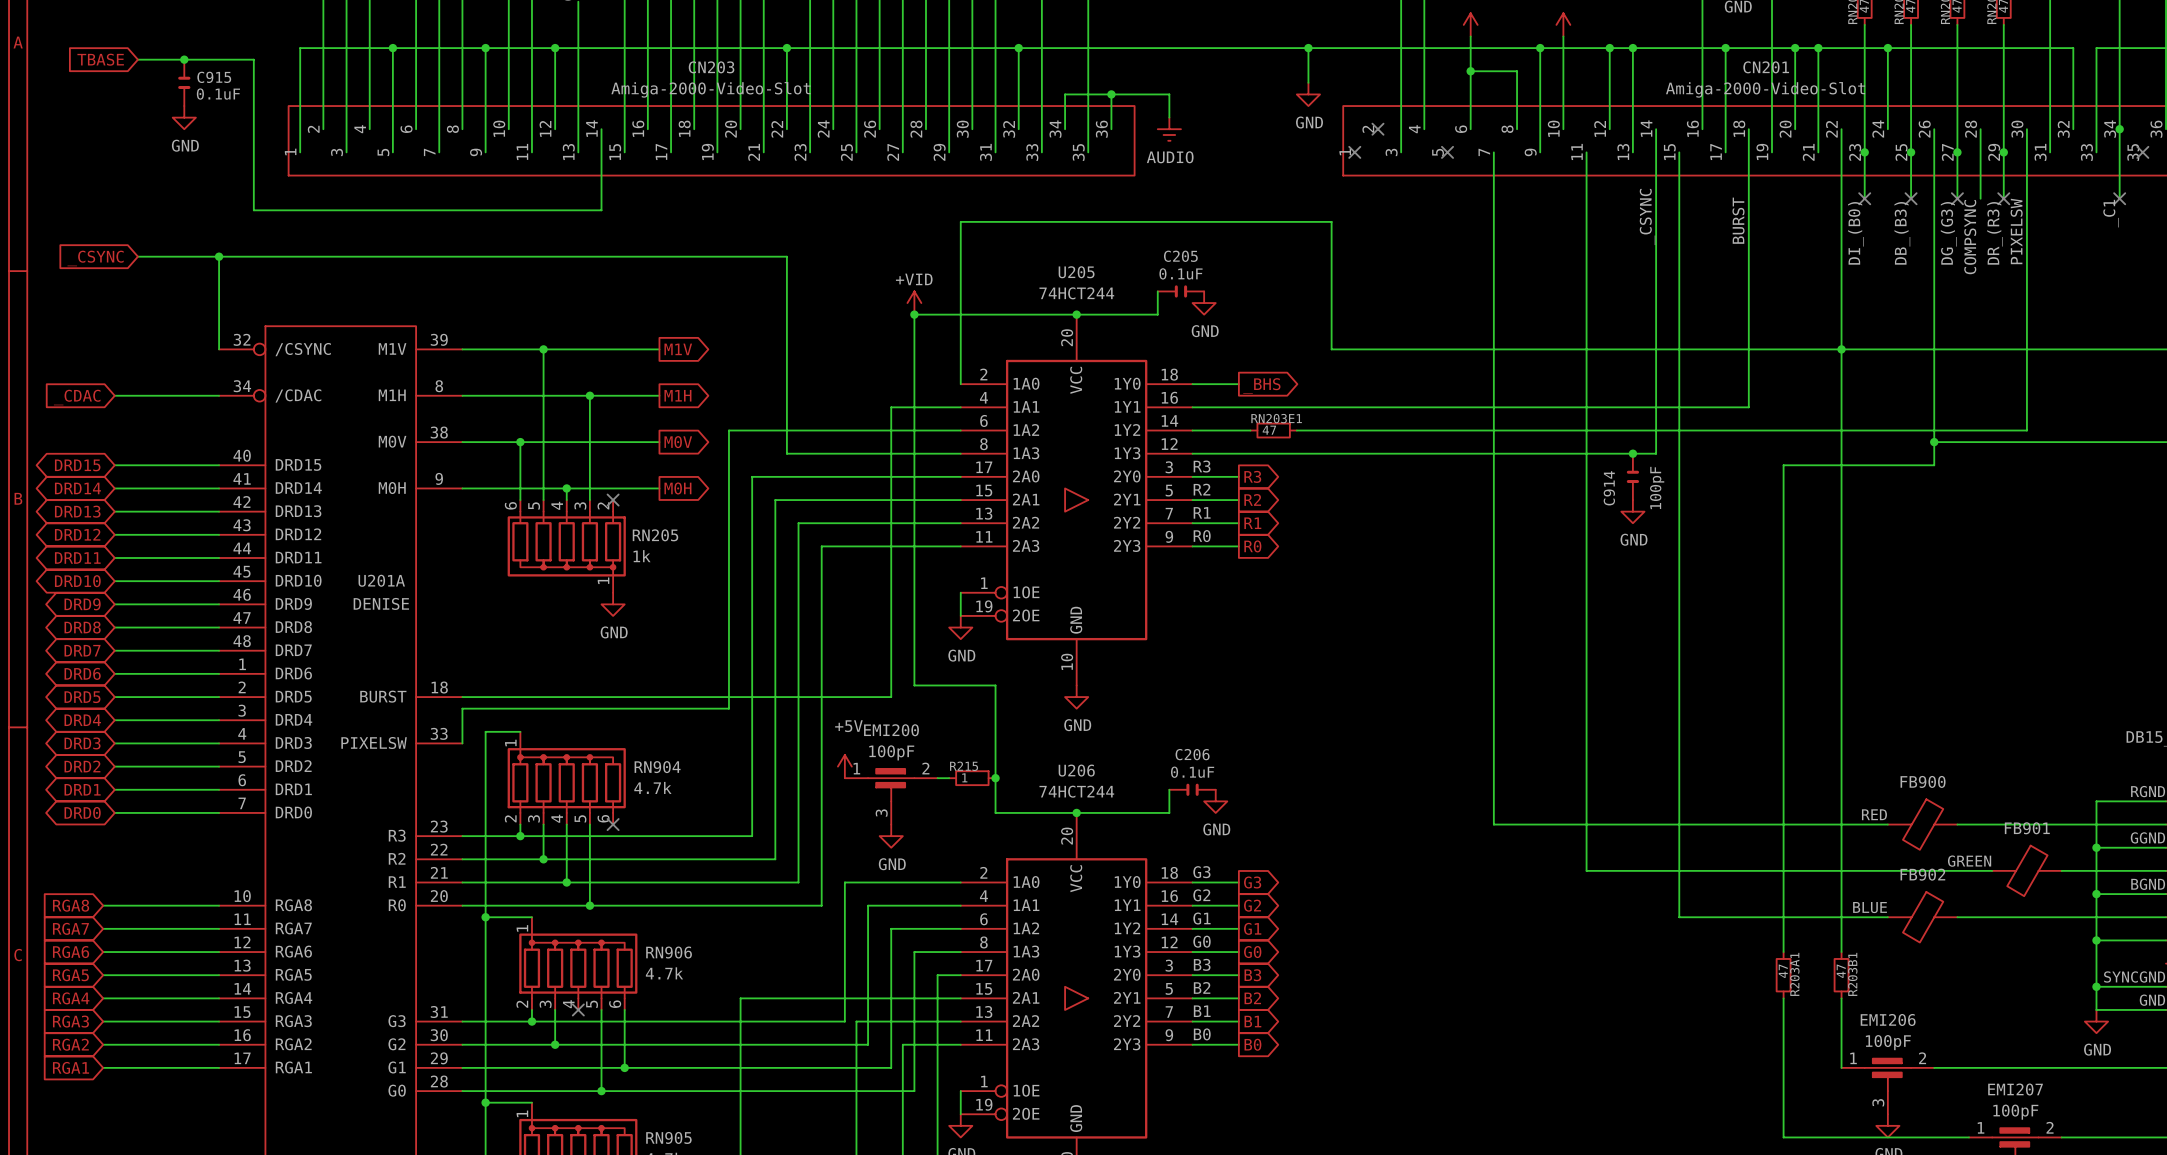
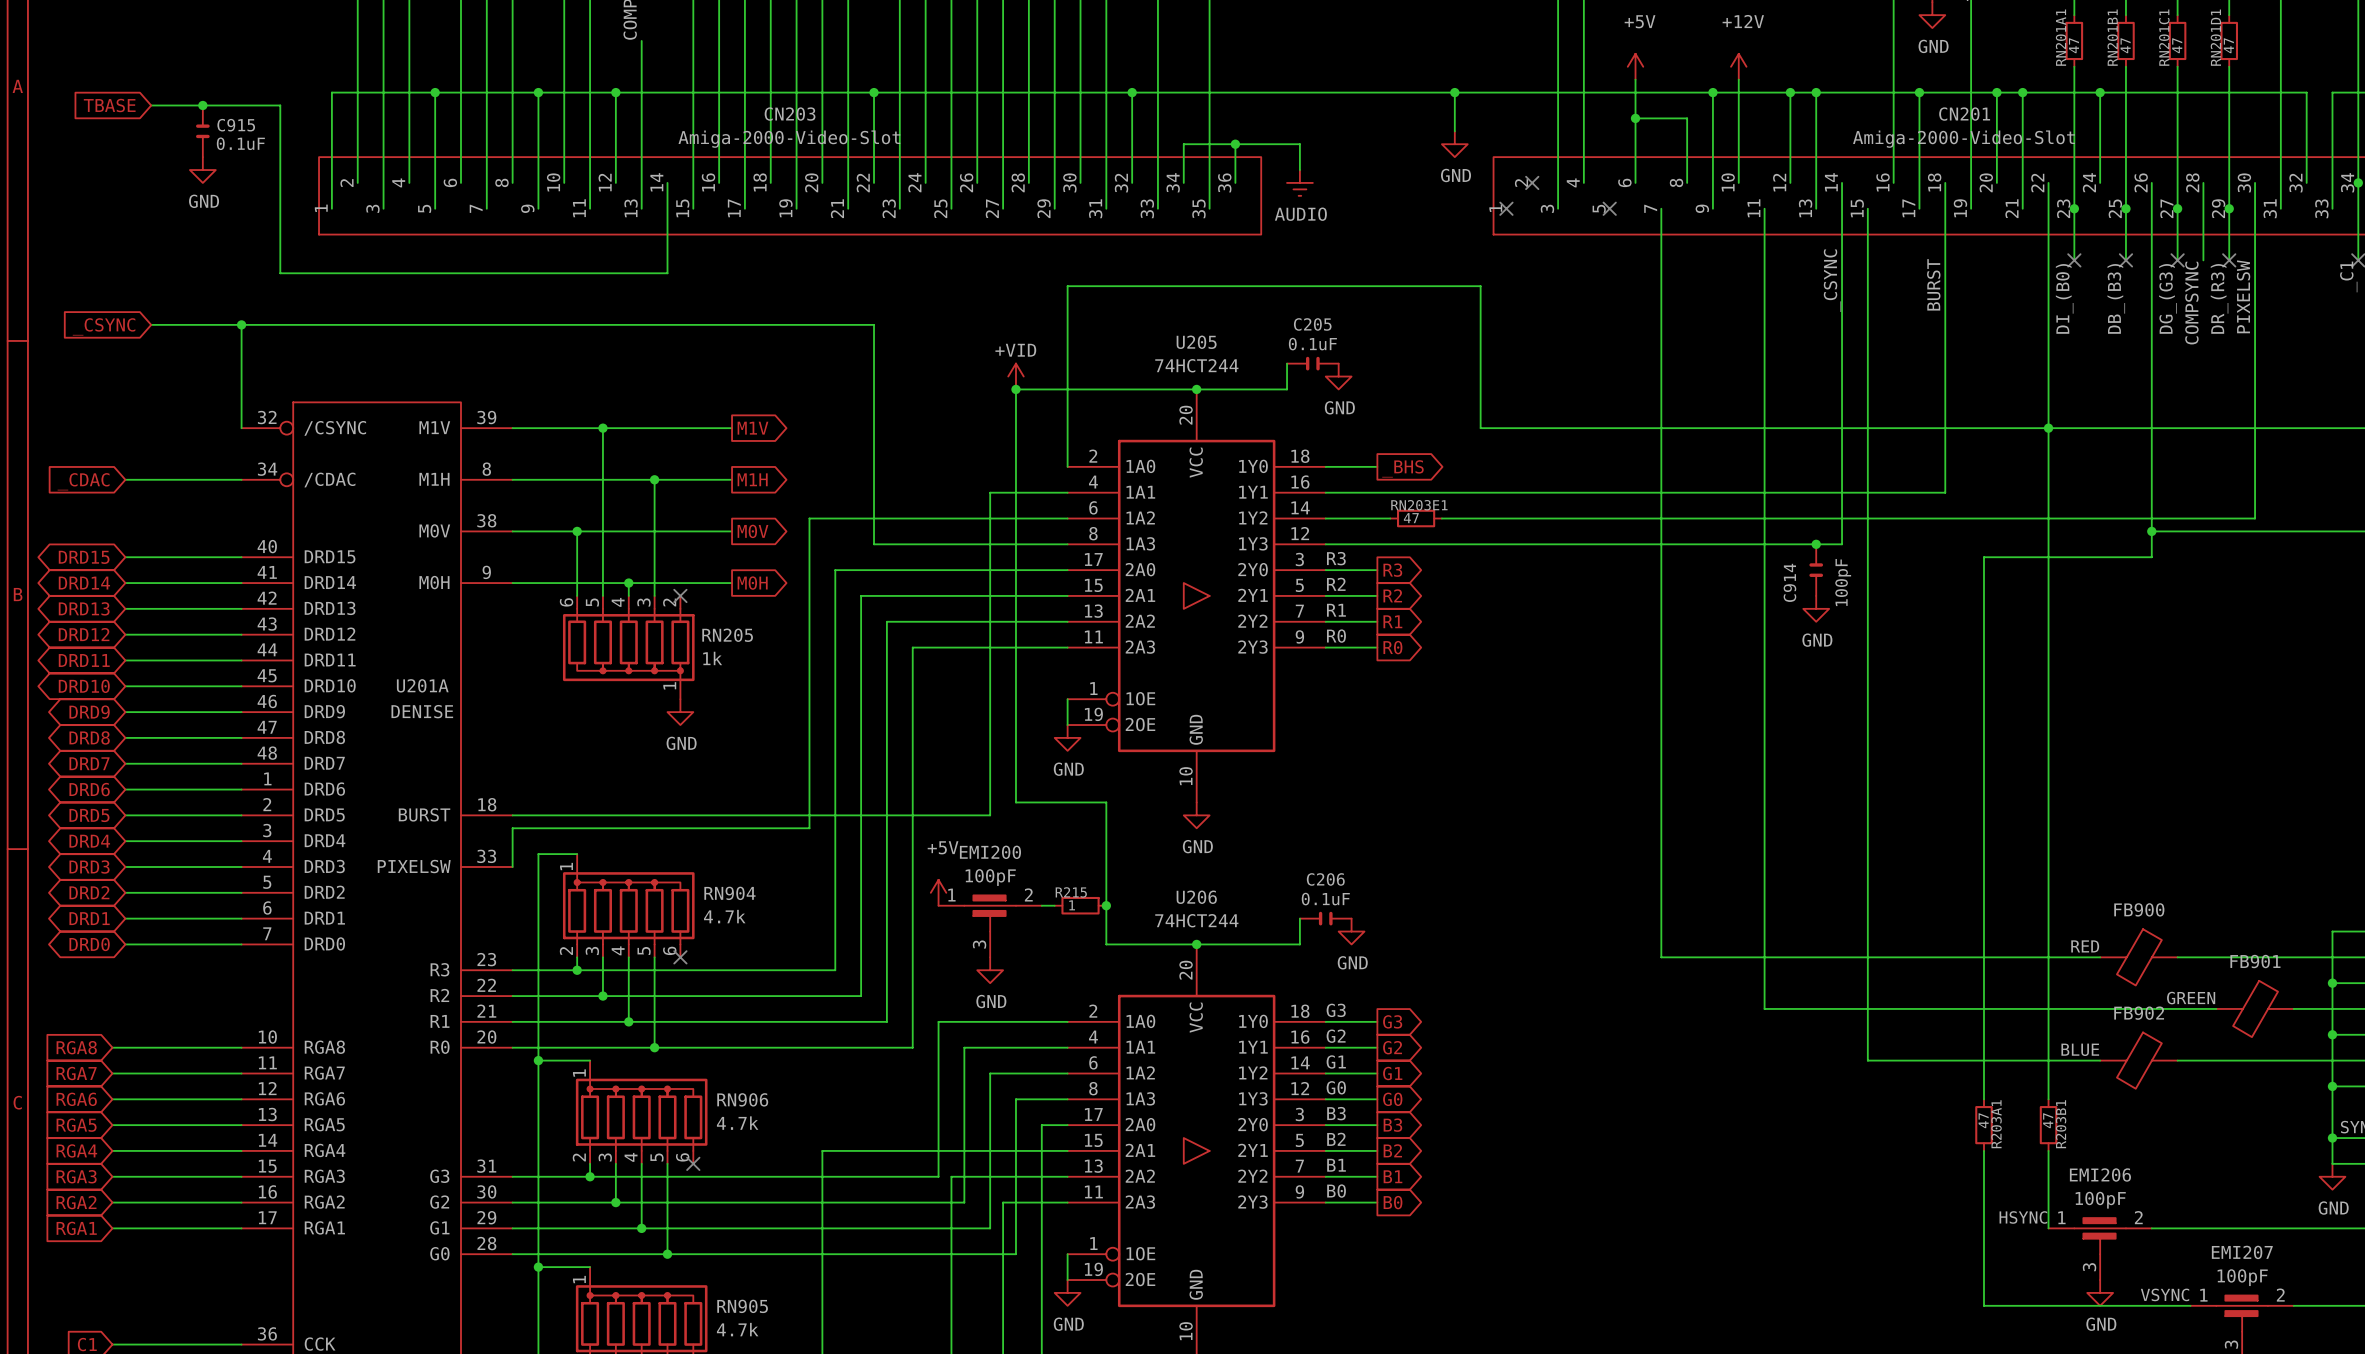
no-connect mark position: (578, 1009) -> (693, 1163)
wire: (624, 1009) (624, 1067) -> (641, 1163) (641, 1228)
label: none -> HSYNC (2023, 1217)
junction position: (624, 1067) -> (641, 1228)
label: none -> VSYNC (2165, 1294)

